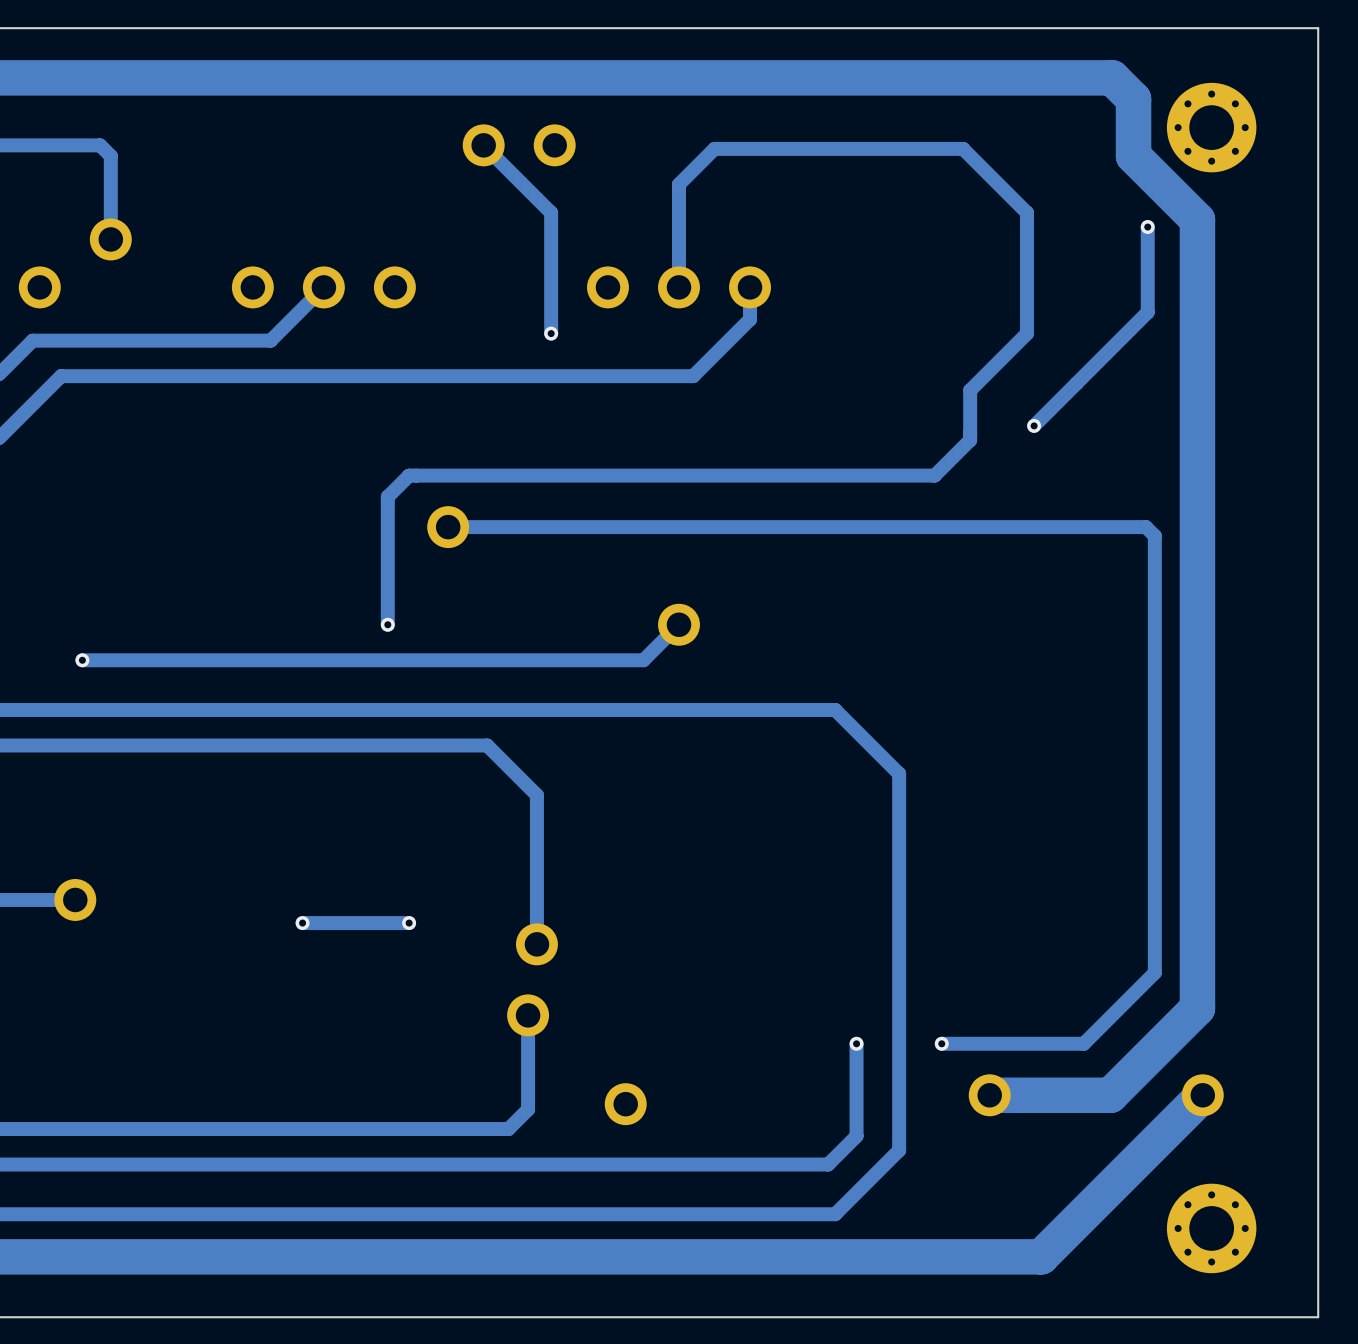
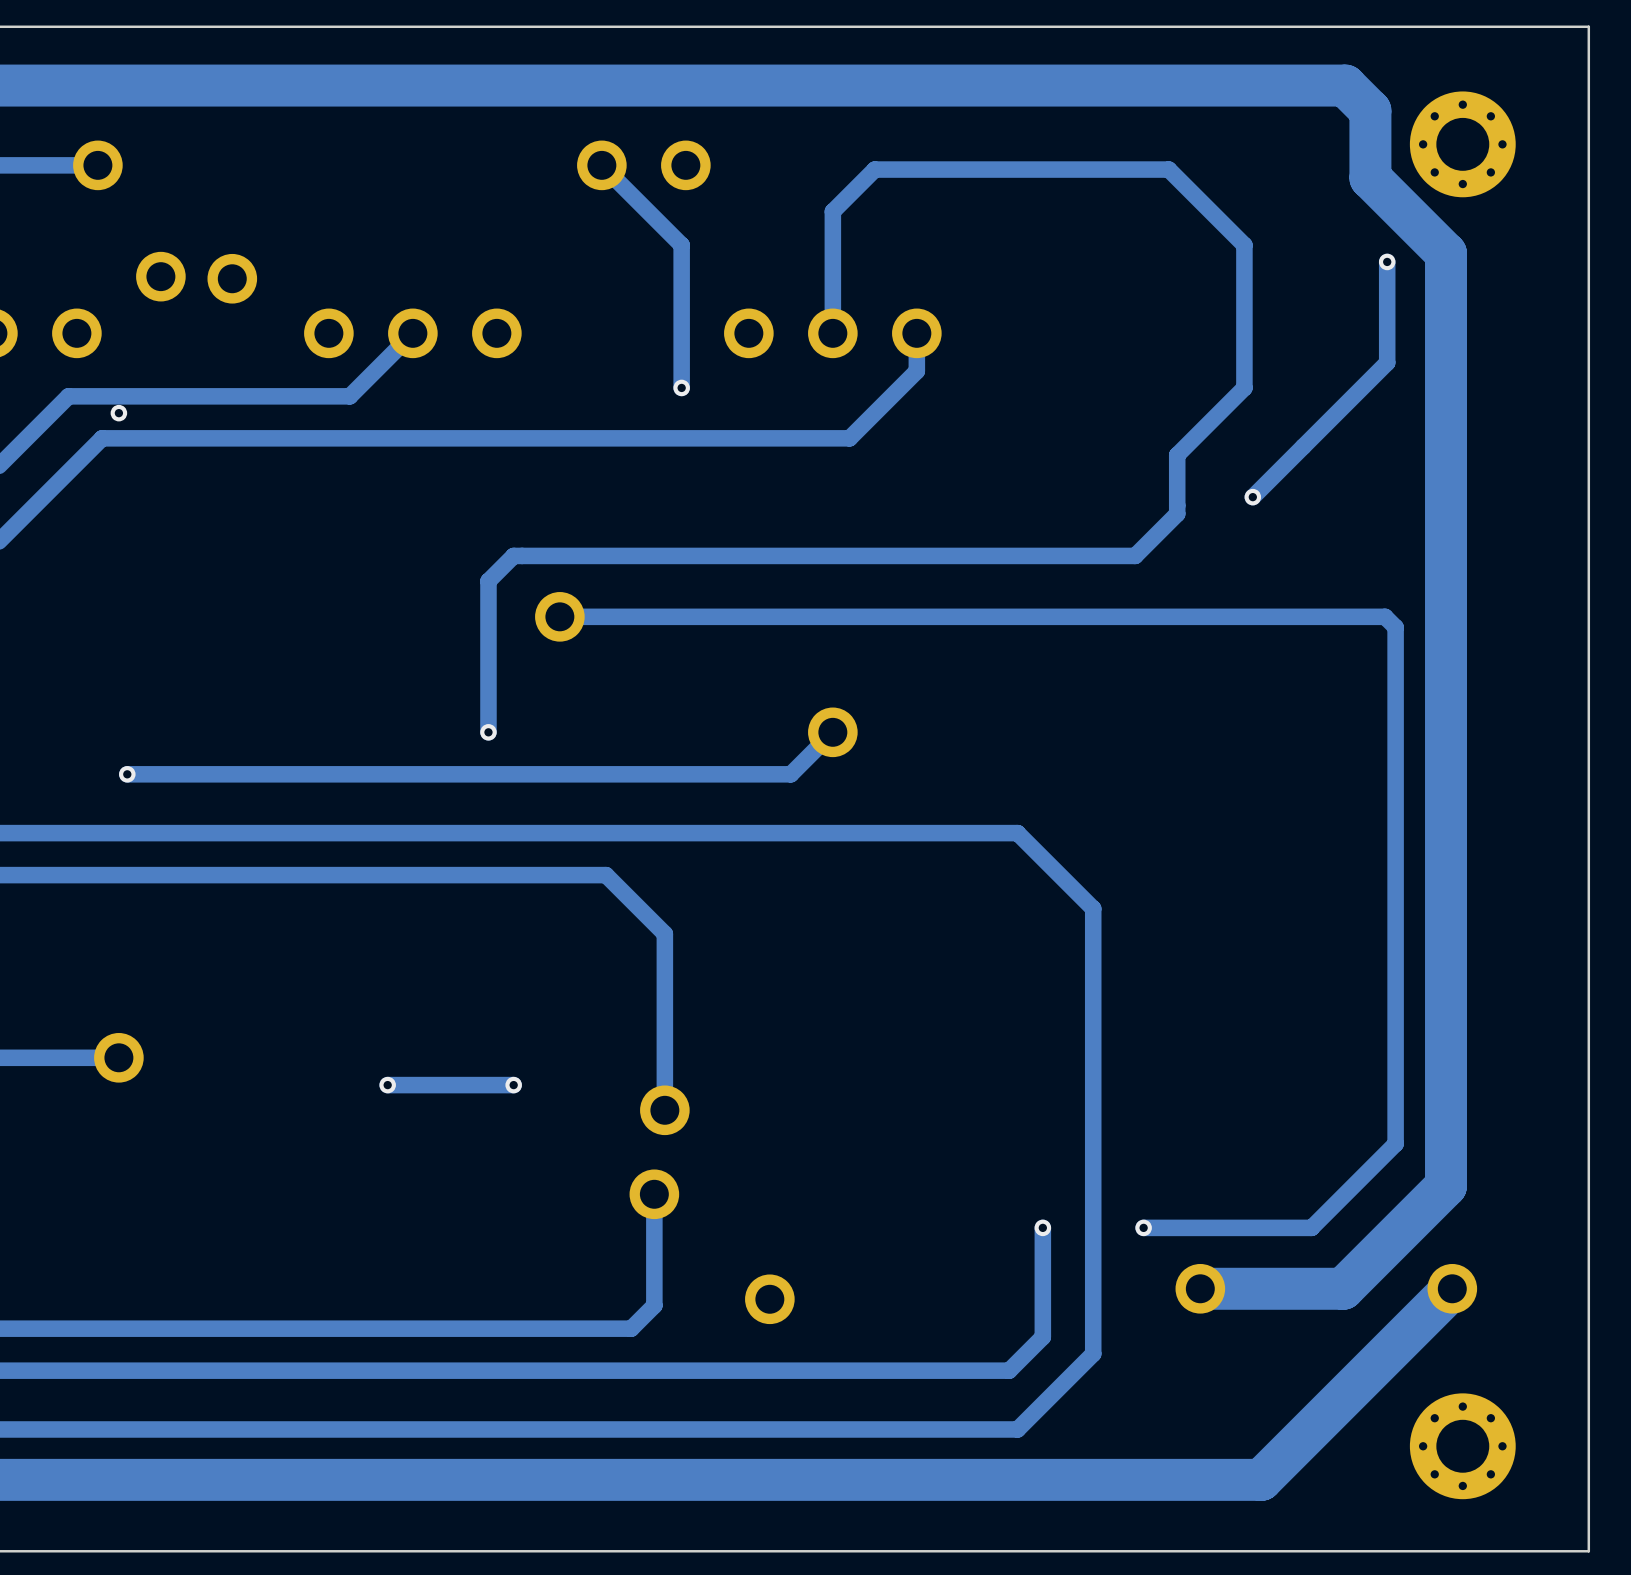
track: (57, 145) (100, 145) (110, 156) (110, 239) -> none
part: none -> (97, 165)
part: none -> (232, 278)
via: none -> (118, 413)

